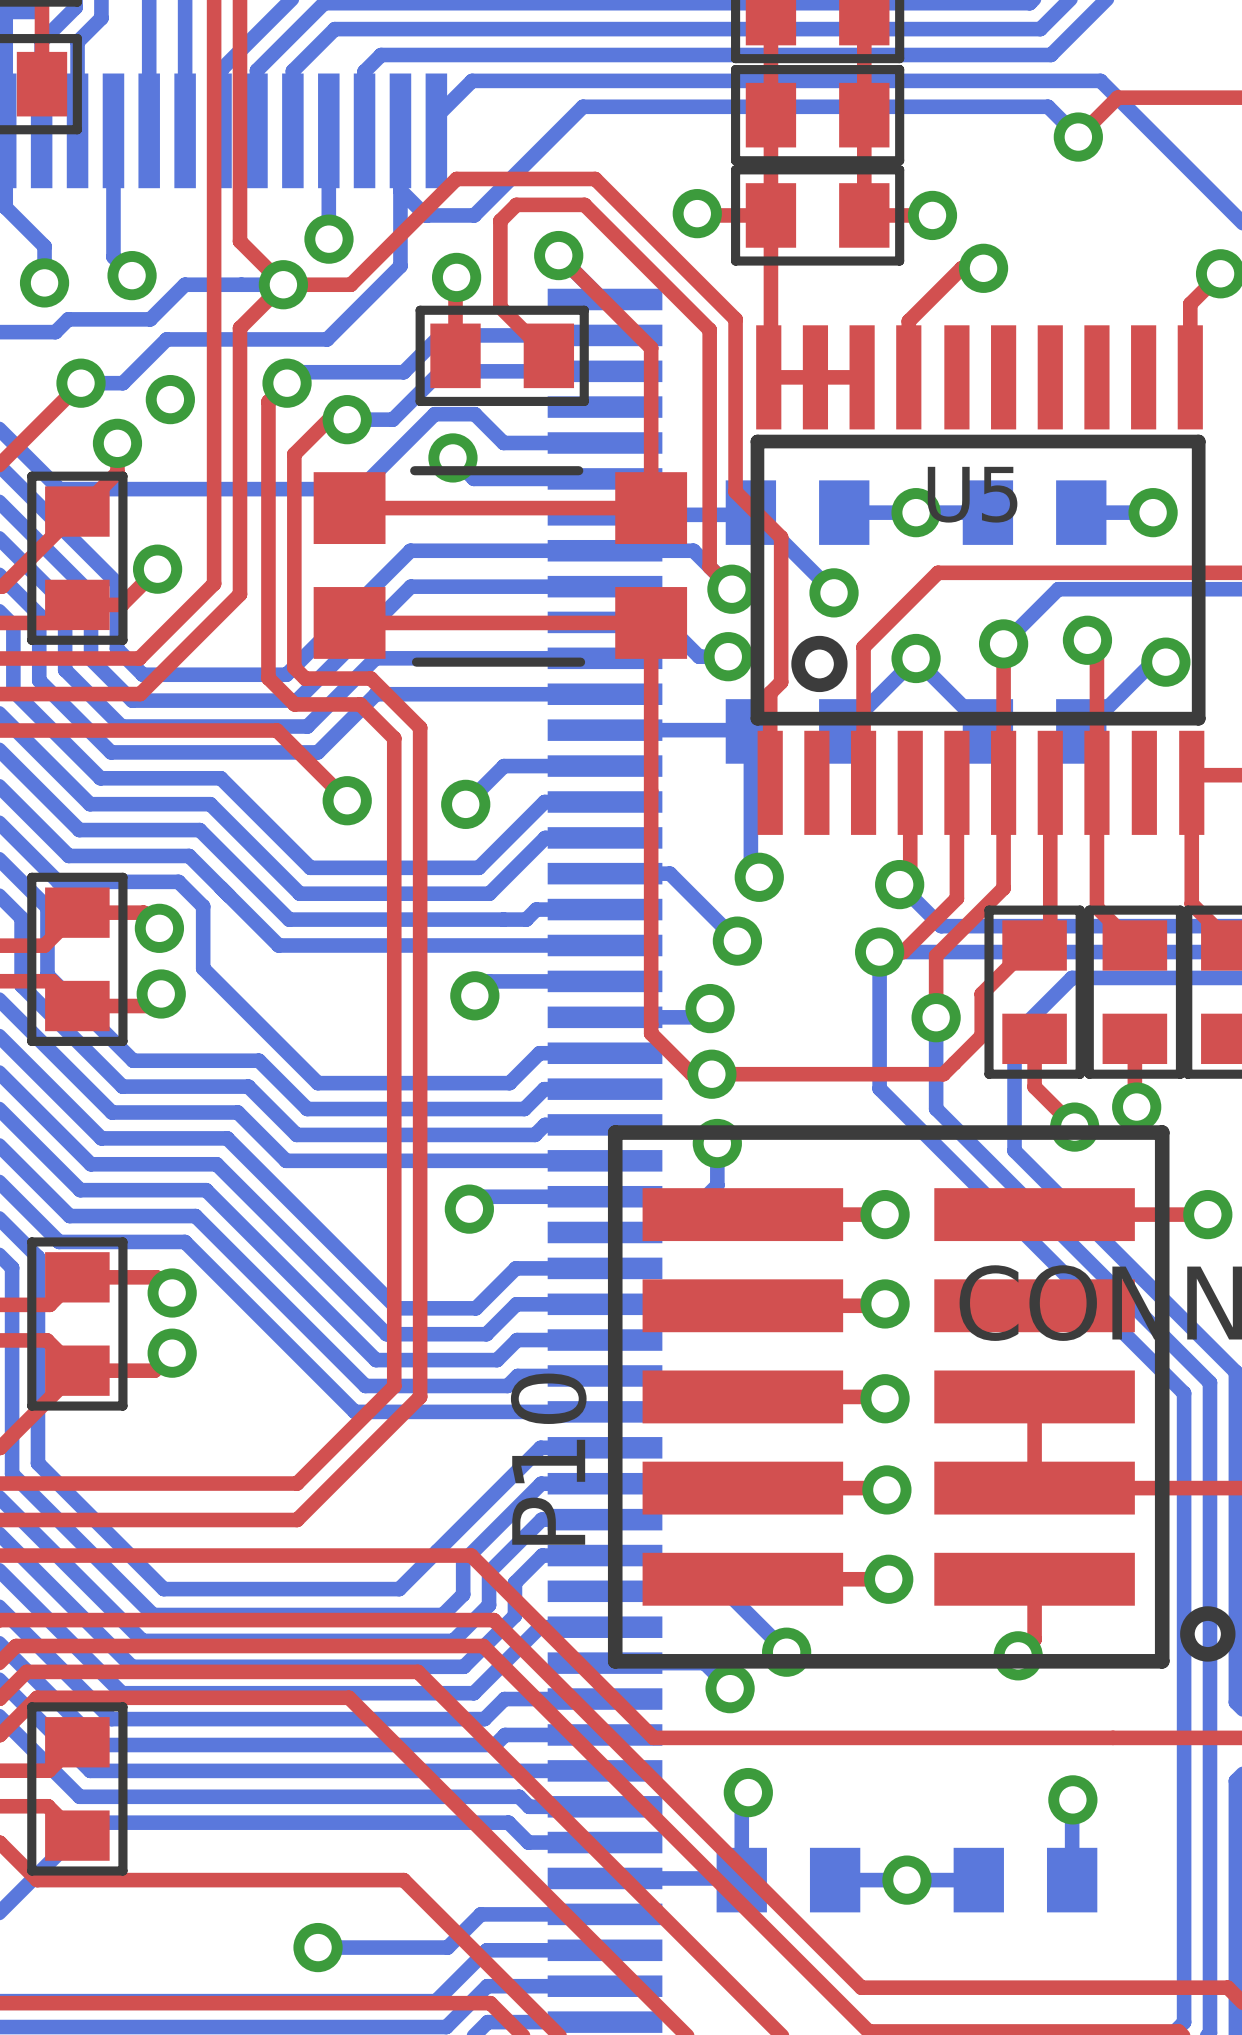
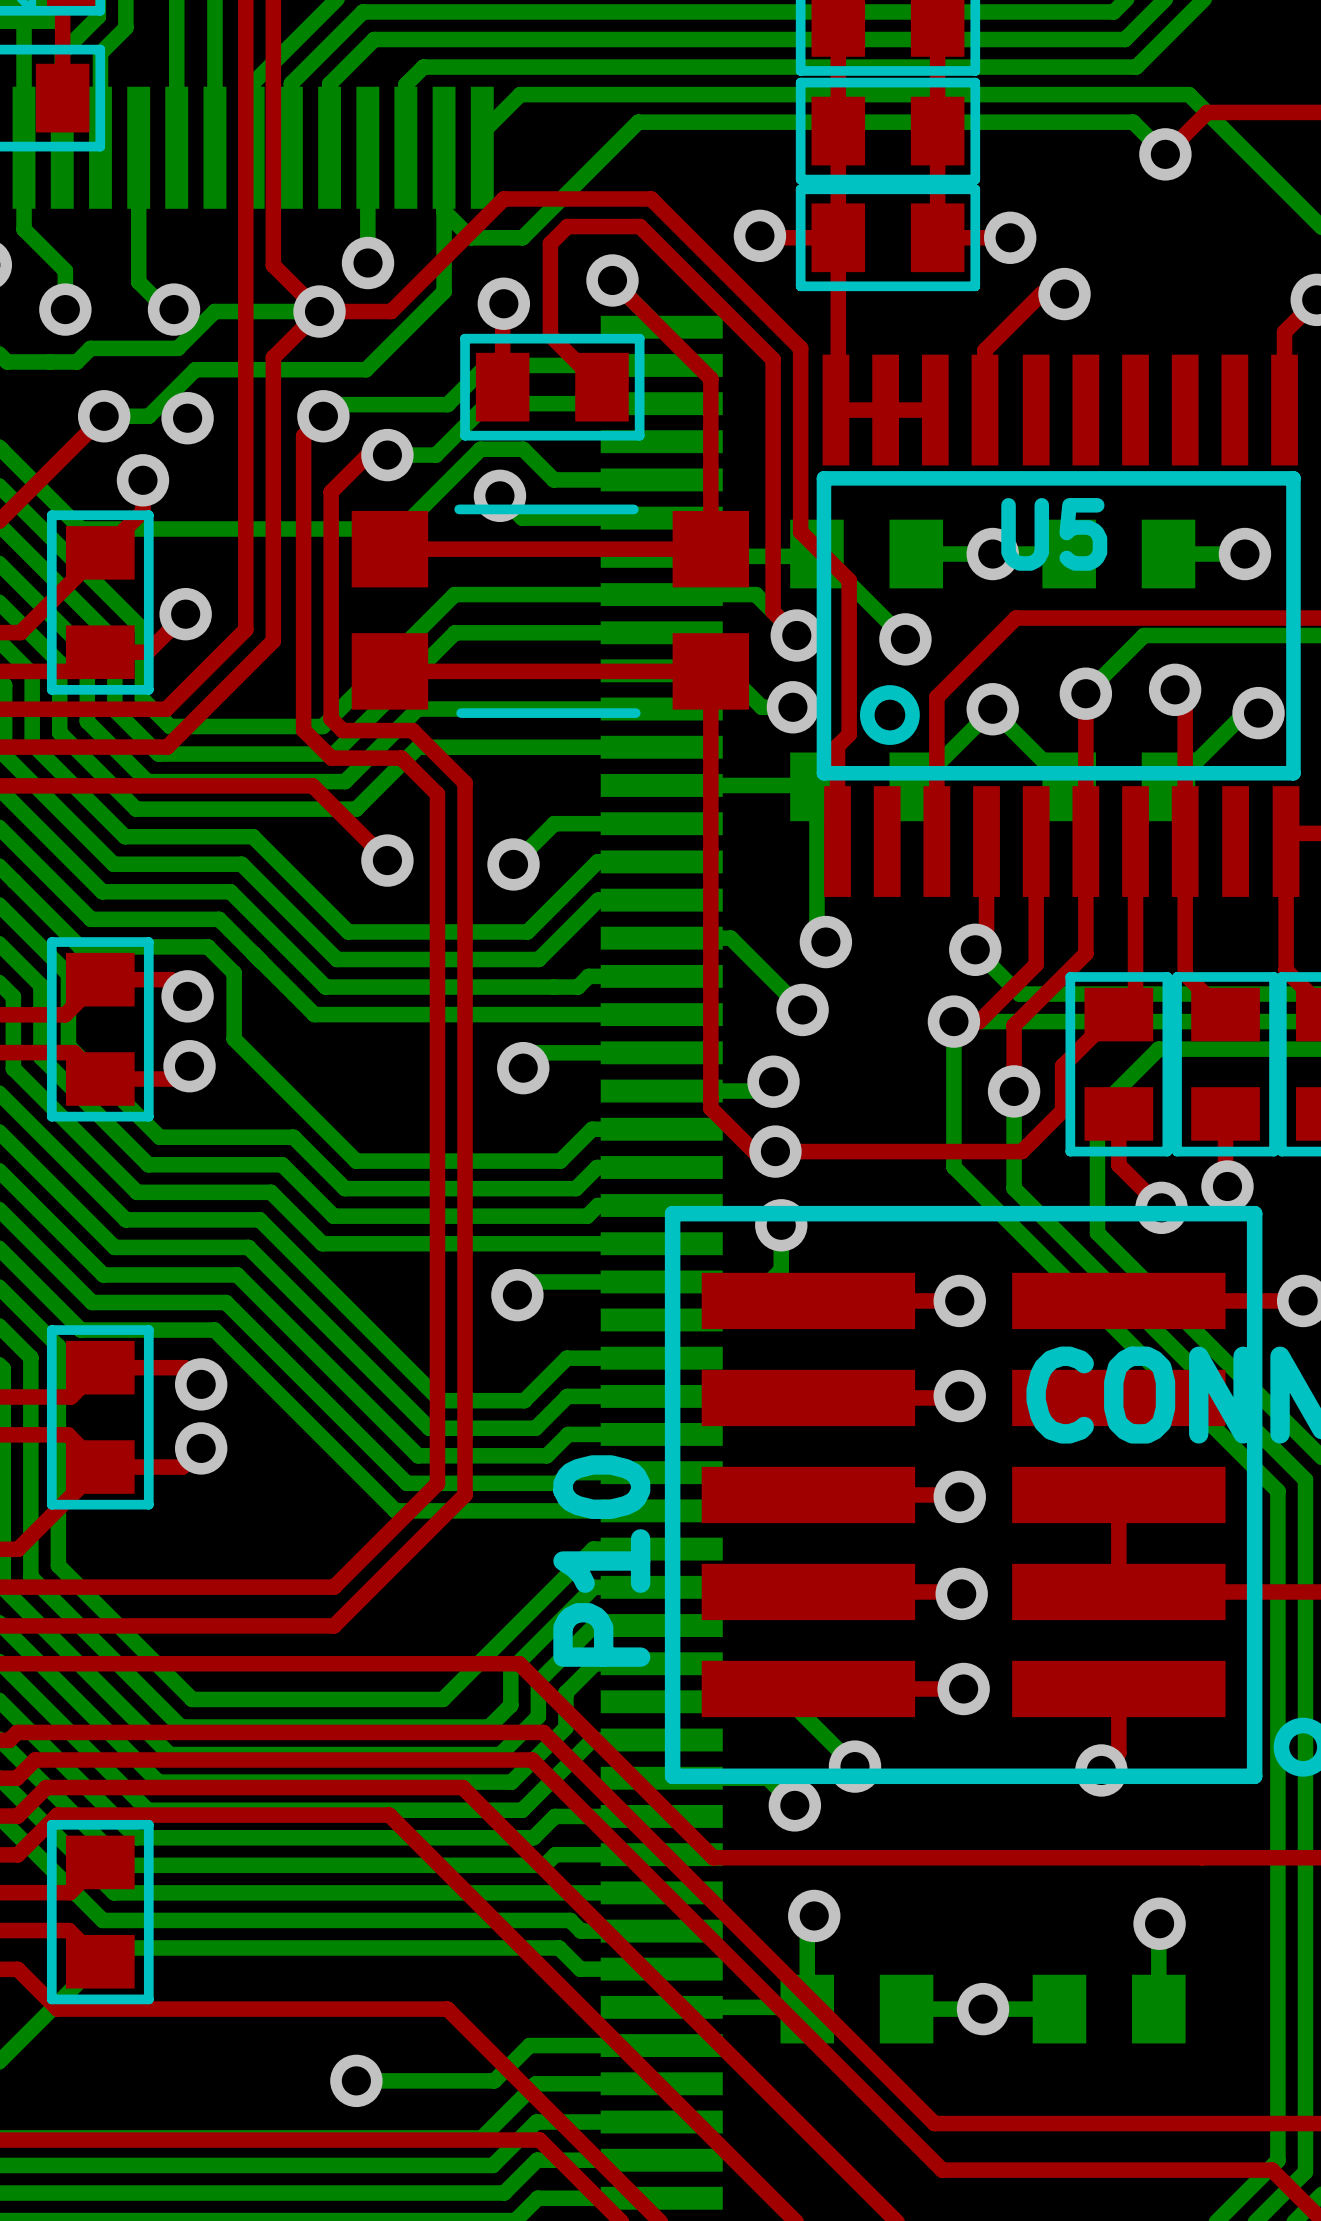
via position: (132, 275) -> (174, 309)
via position: (170, 399) -> (187, 418)

